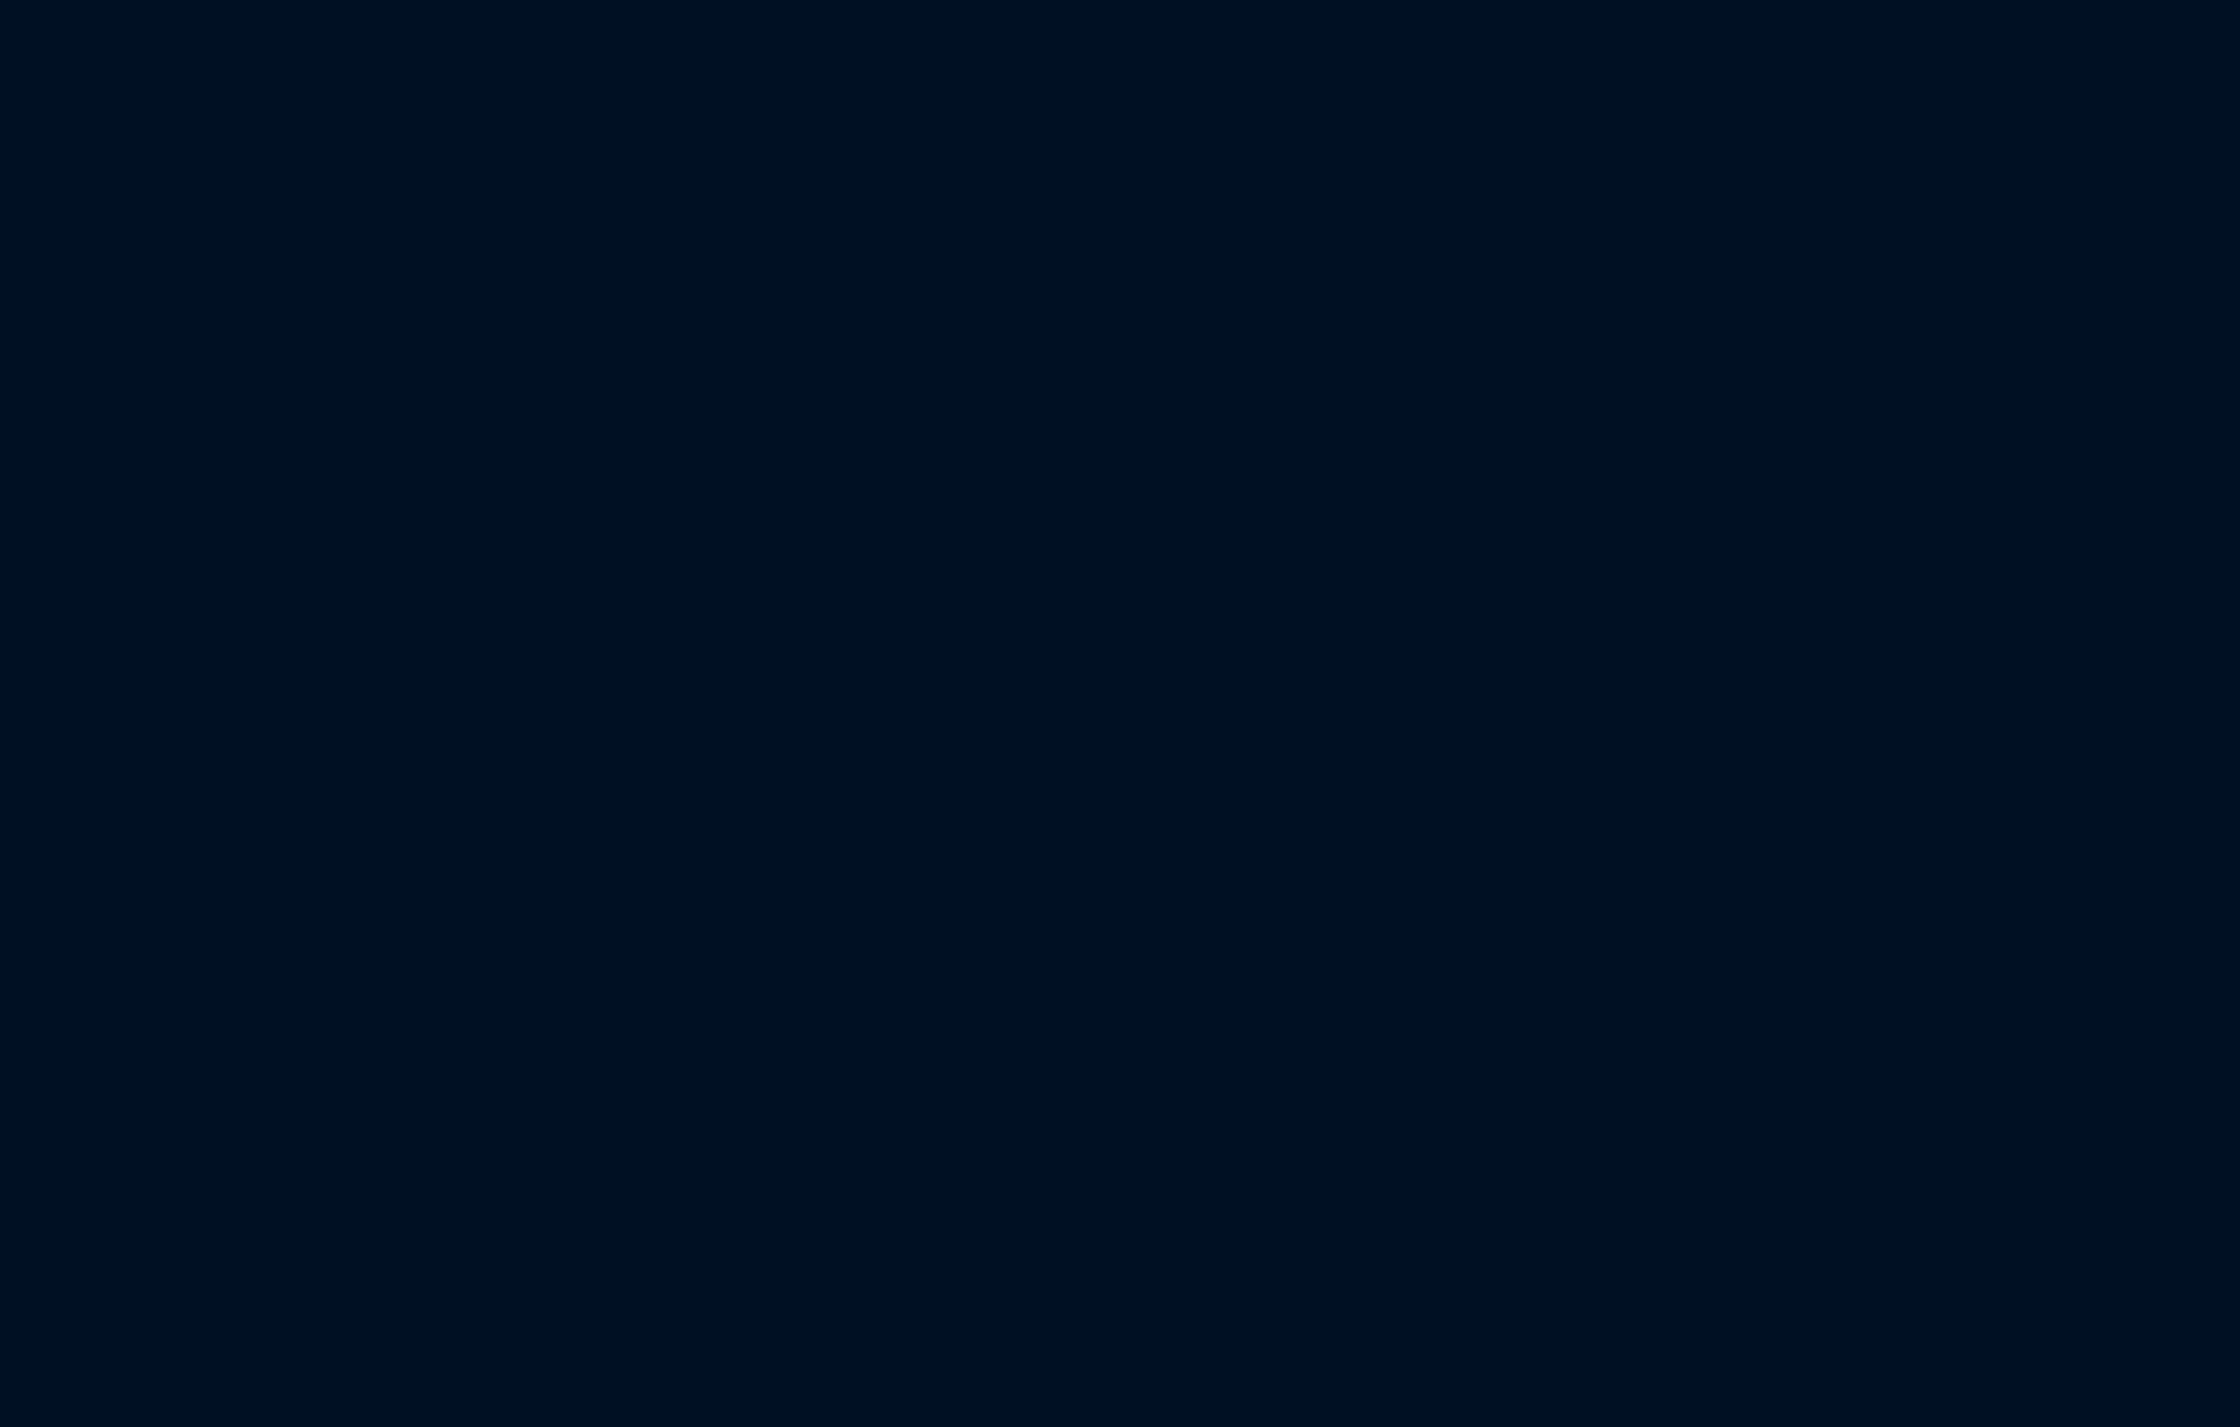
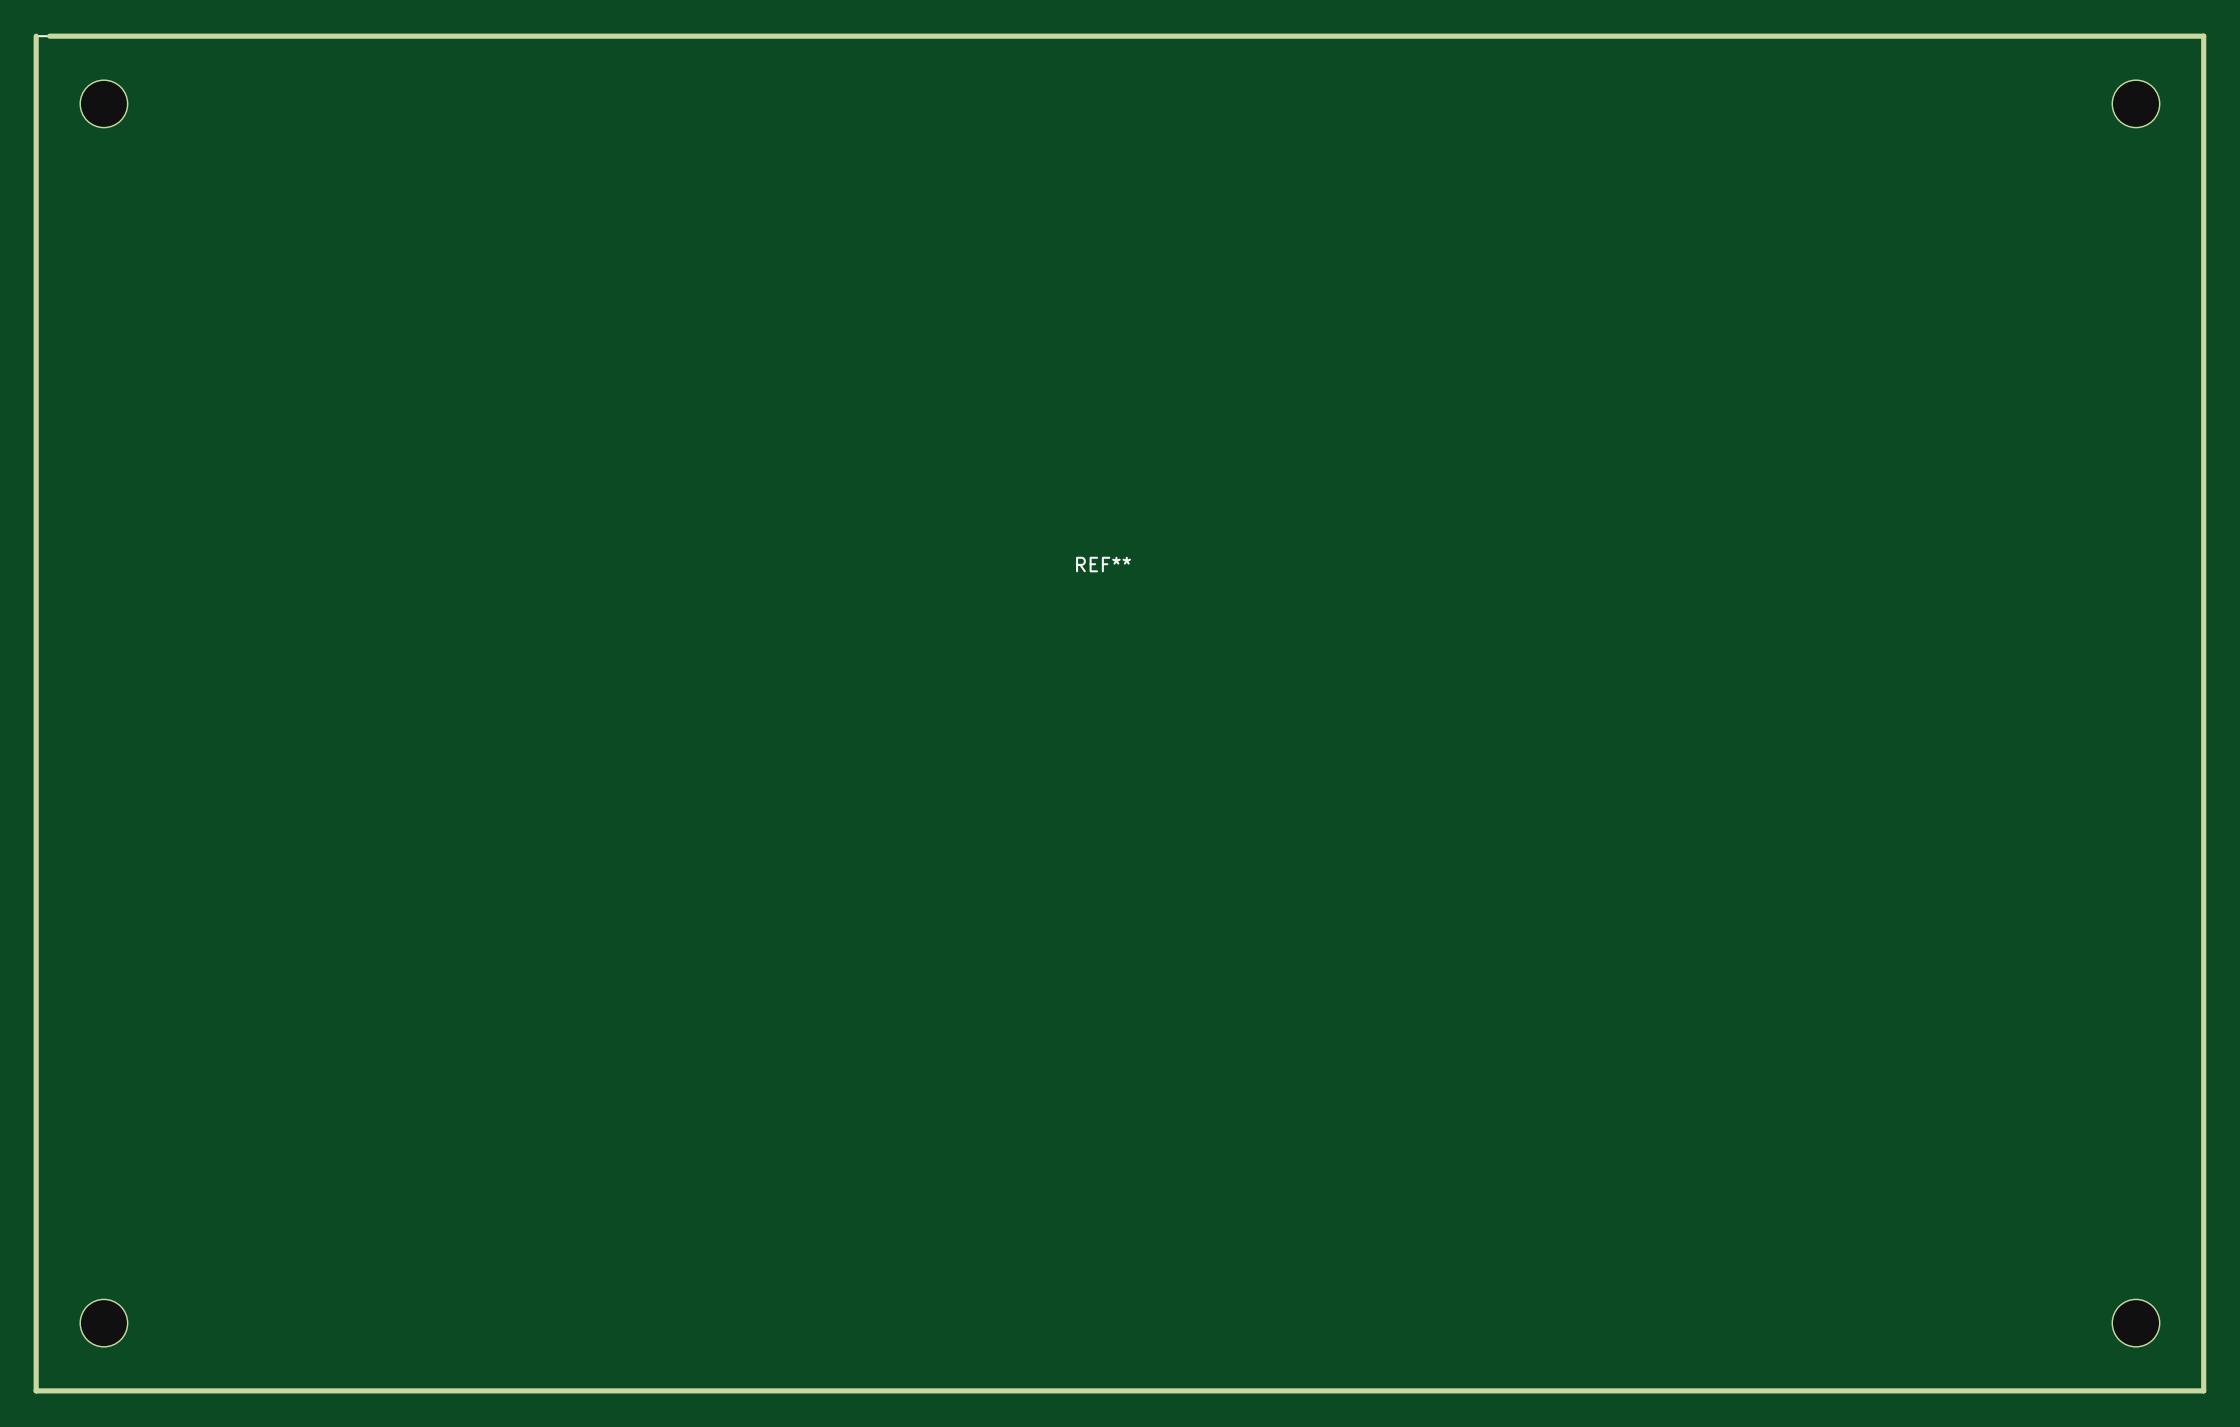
REF**: none -> (1119, 713)

